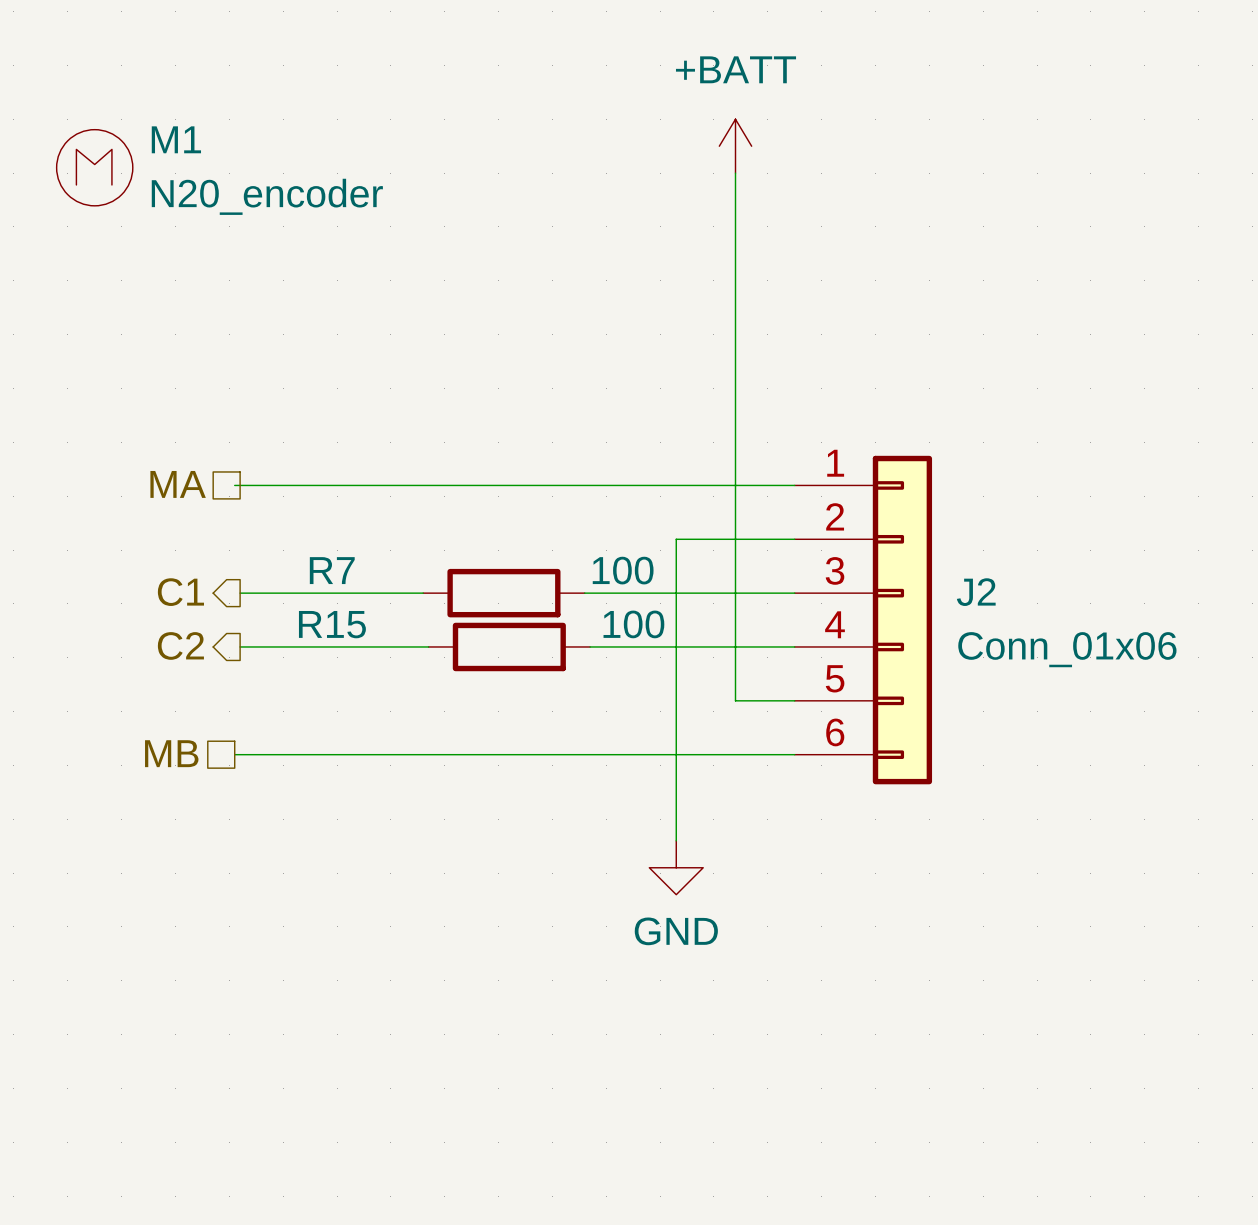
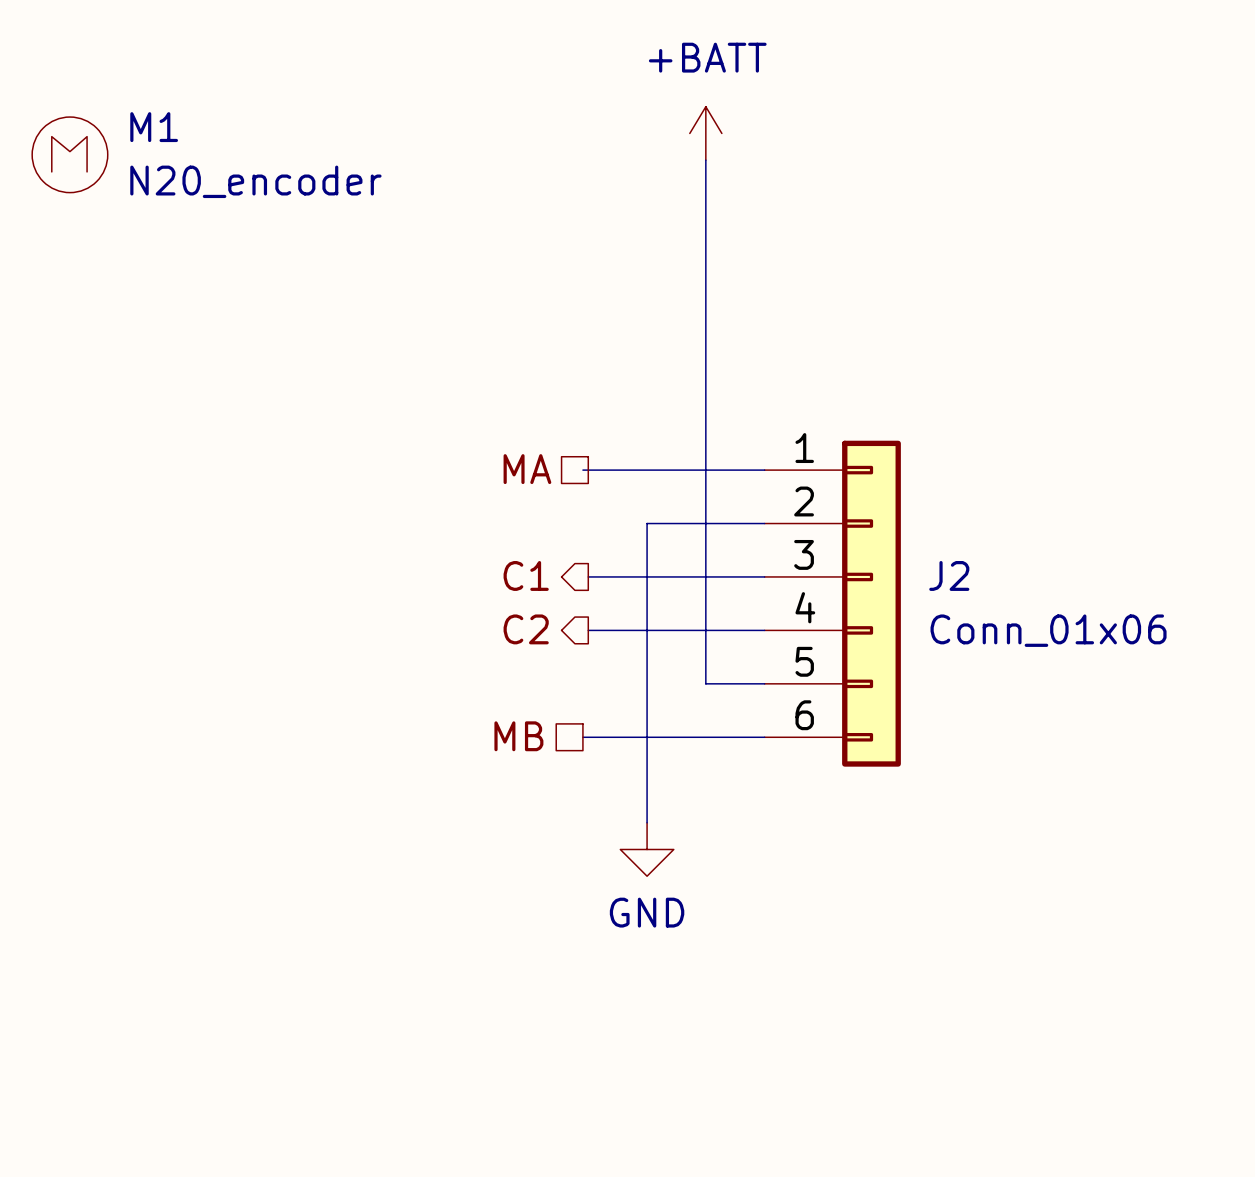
hierarchical label position: MA (178, 484) -> MA (527, 469)
wire: (234, 485) (611, 485) -> none
hierarchical label position: C1 (180, 592) -> C1 (526, 575)
wire: (240, 593) (423, 593) -> none
R7: 100 (503, 593) -> none
wire: (584, 593) (617, 593) -> none
hierarchical label position: C2 (180, 645) -> C2 (526, 629)
wire: (240, 646) (428, 646) -> none
R15: 100 (509, 646) -> none
wire: (590, 646) (617, 646) -> none
hierarchical label position: MB (171, 753) -> MB (518, 736)
wire: (234, 754) (611, 754) -> none

